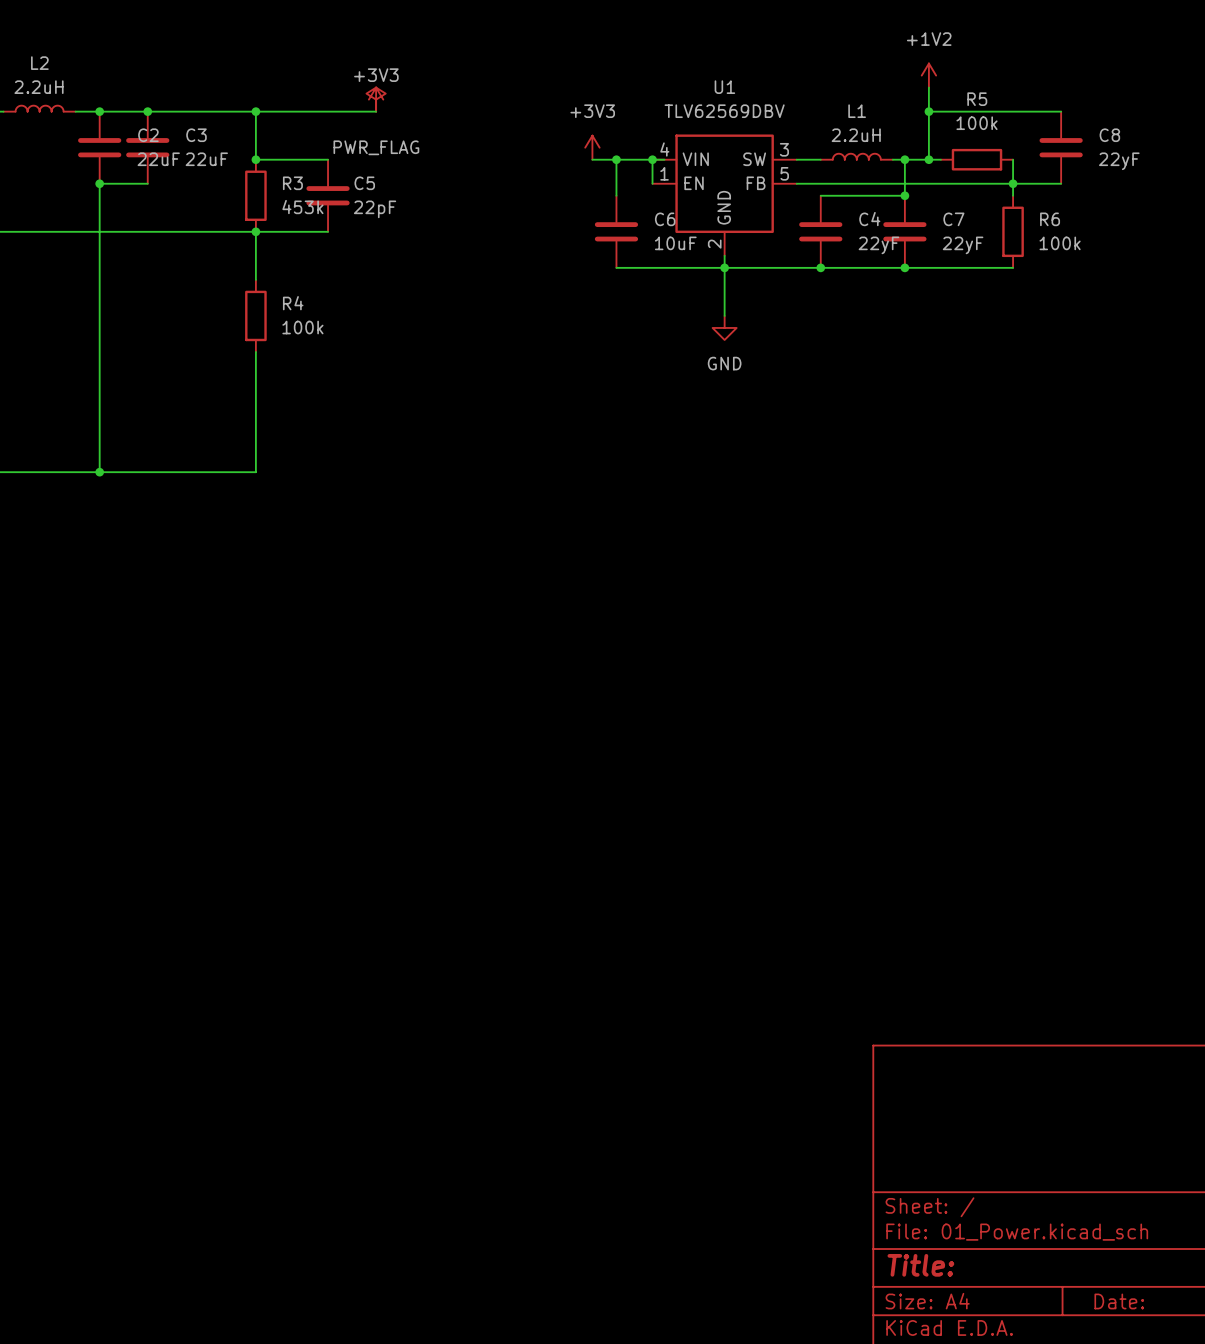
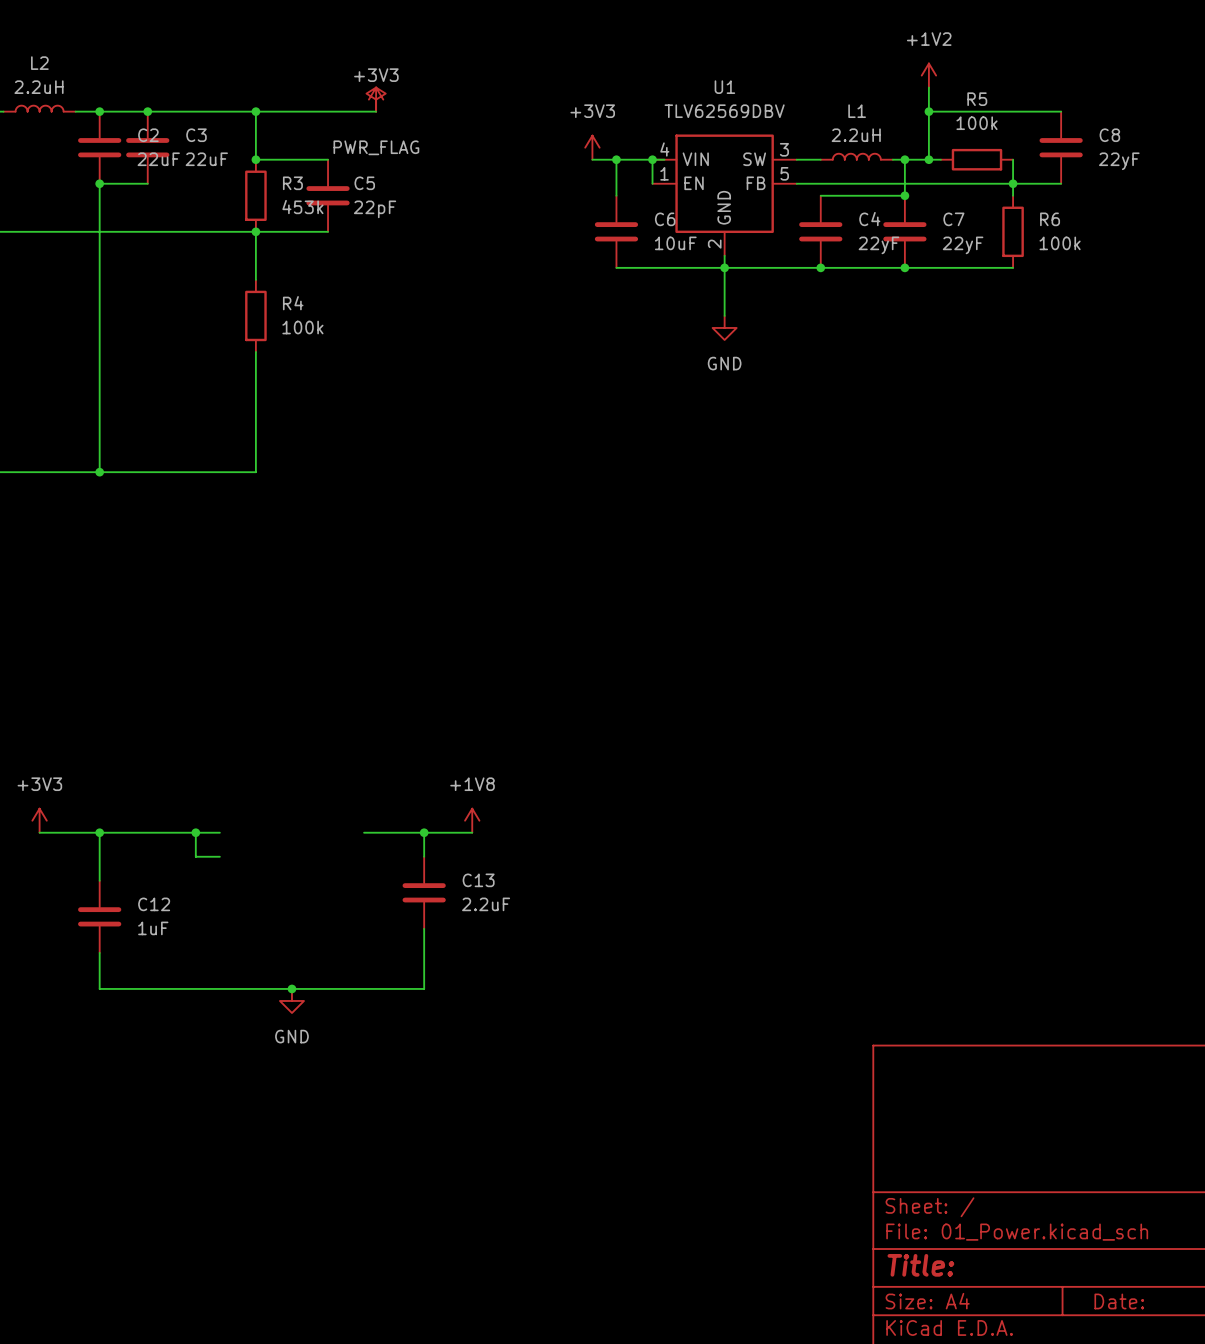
power symbol: none -> +3V3 (39, 820)
power symbol: none -> +1V8 (472, 820)
wire: none -> (39, 832) (219, 832)
wire: none -> (99, 832) (99, 880)
junction: none -> (99, 832)
wire: none -> (195, 832) (195, 856) (219, 856)
junction: none -> (195, 832)
wire: none -> (364, 832) (472, 832)
wire: none -> (424, 832) (424, 856)
junction: none -> (424, 832)
C13: none -> 2.2uF (424, 892)
C12: none -> 1uF (99, 916)
wire: none -> (424, 928) (424, 988) (99, 988) (99, 952)
junction: none -> (291, 988)
power symbol: none -> GND (291, 1000)

